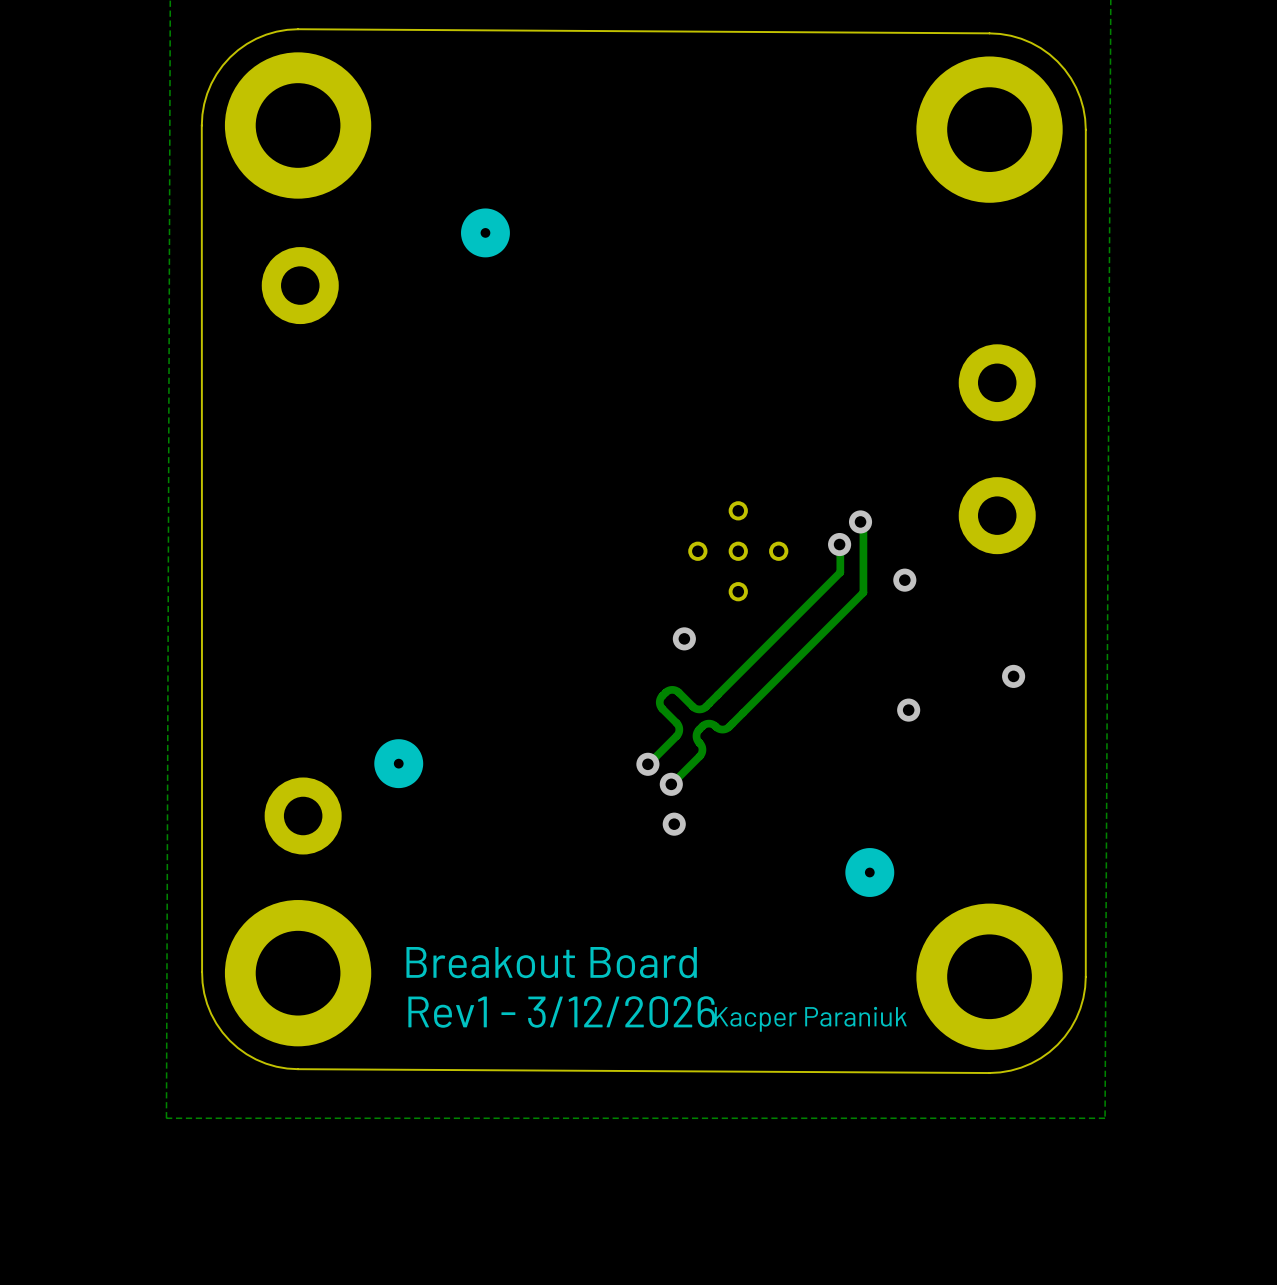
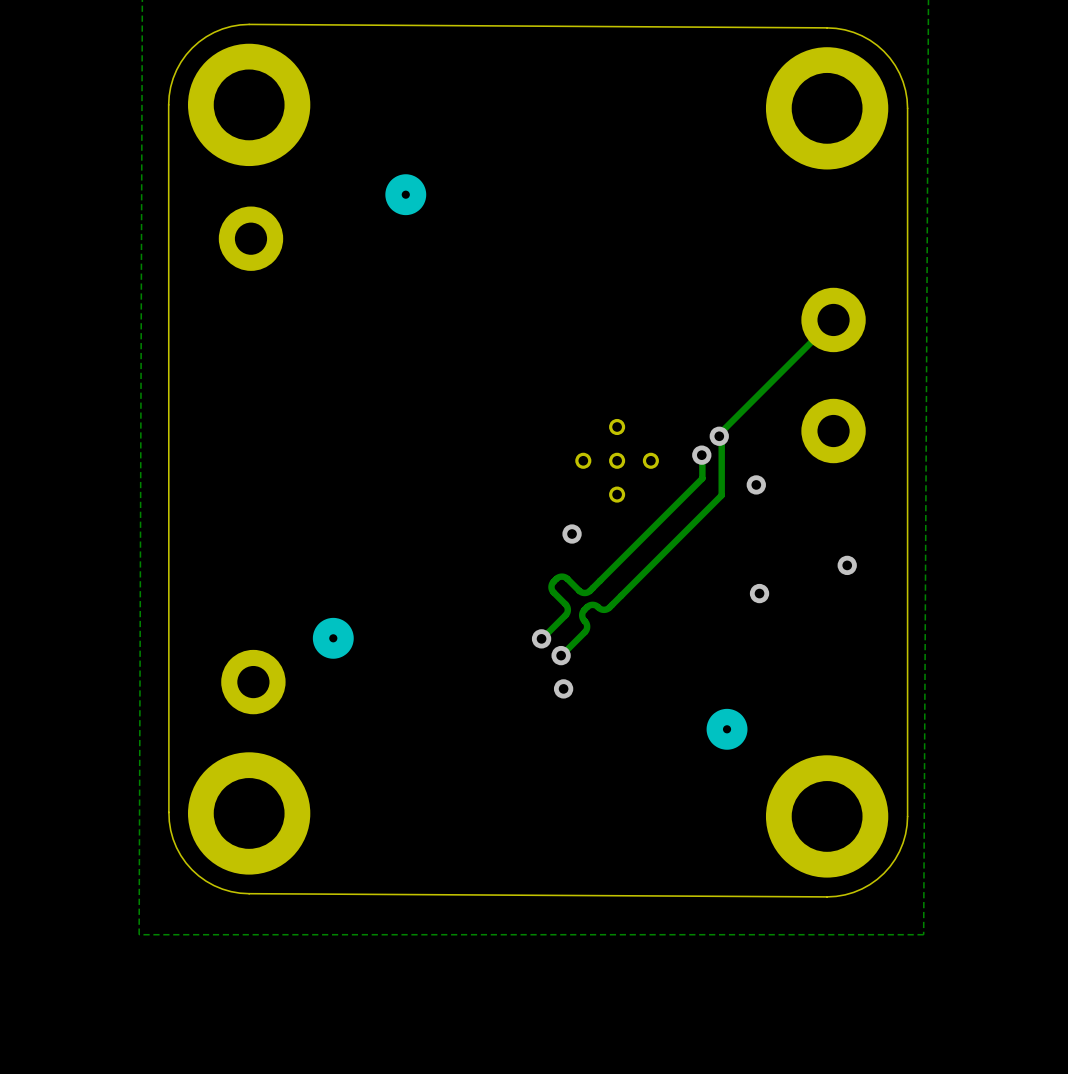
track: none -> (833, 319) (719, 434)
text: Breakout Board (551, 962) -> none
text: Rev1 - 3/12/2026 (561, 1011) -> none
text: Kacper Paraniuk (810, 1019) -> none

